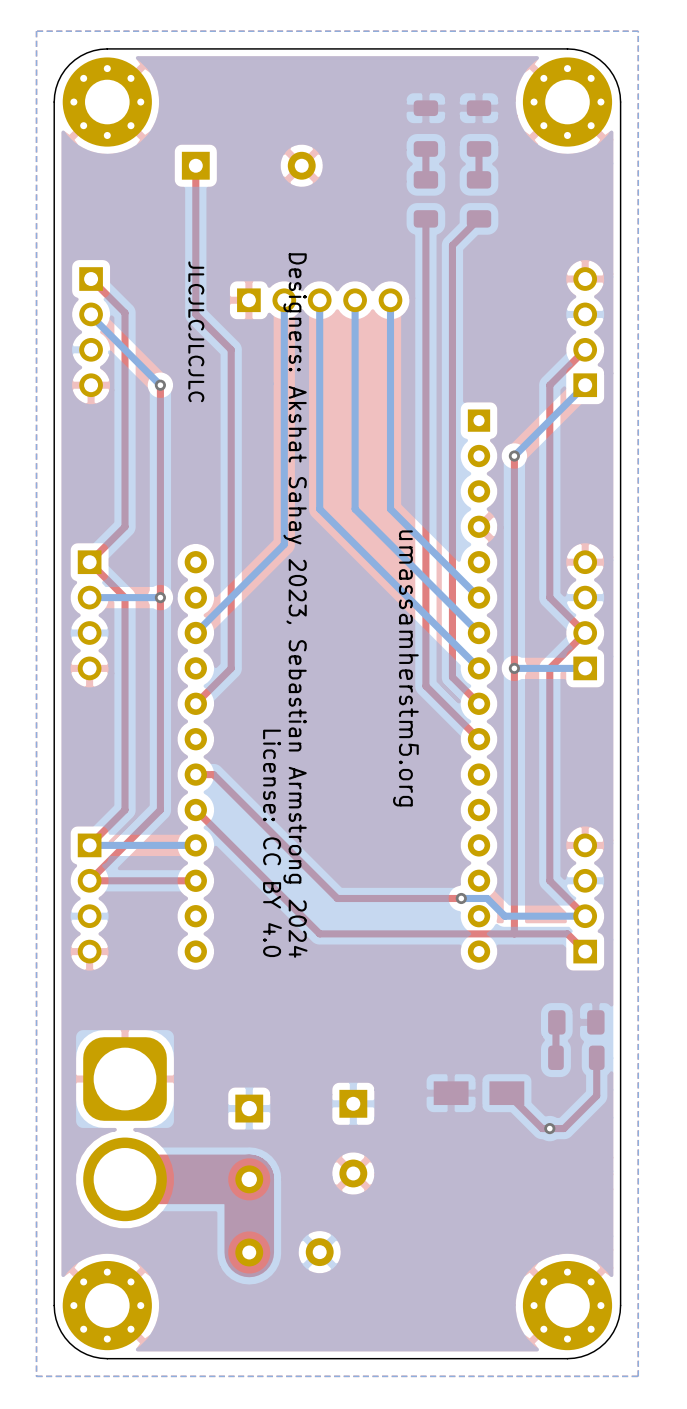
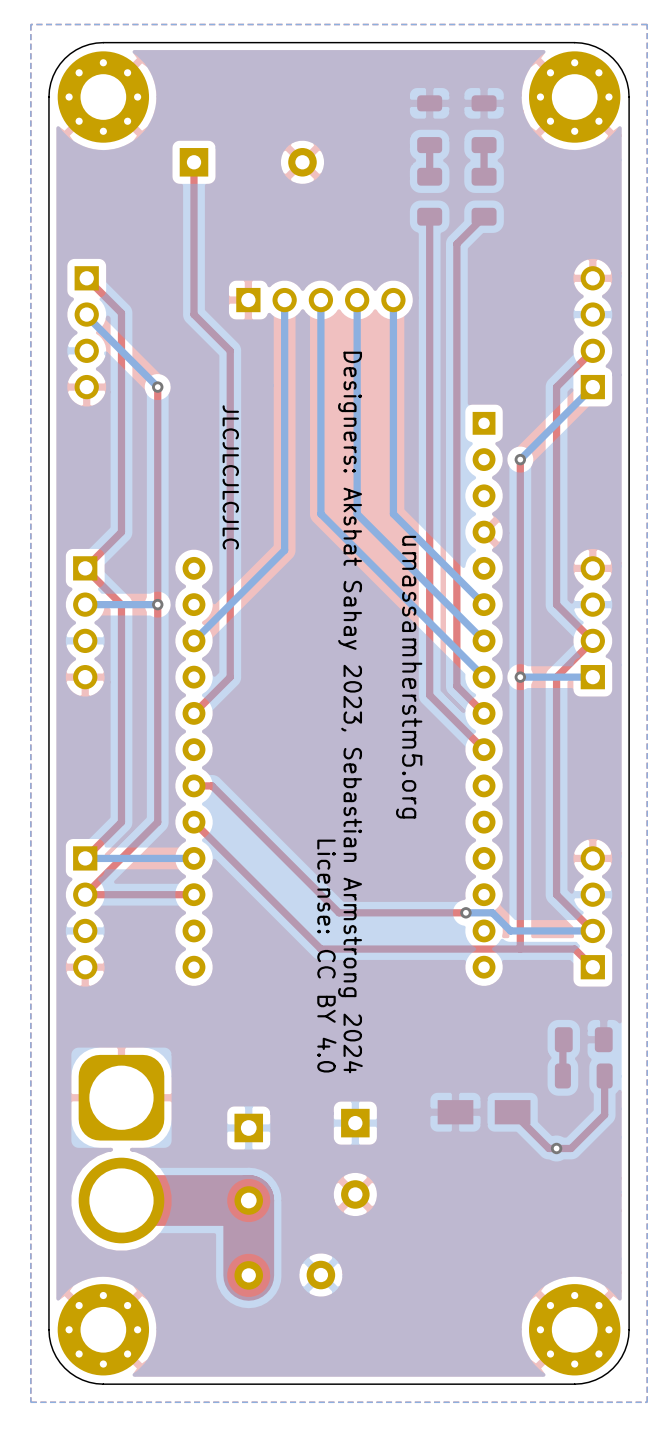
text position: JLCJLCJLCJLC (196, 331) -> JLCJLCJLCJLC (230, 477)
text position: Designers: Akshat Sahay 2023, Sebastian Armstrong 2024 (295, 605) -> Designers: Akshat Sahay 2023, Sebastian Armstrong 2024 (350, 712)
text position: License: CC BY 4.0 (272, 843) -> License: CC BY 4.0 (326, 956)

